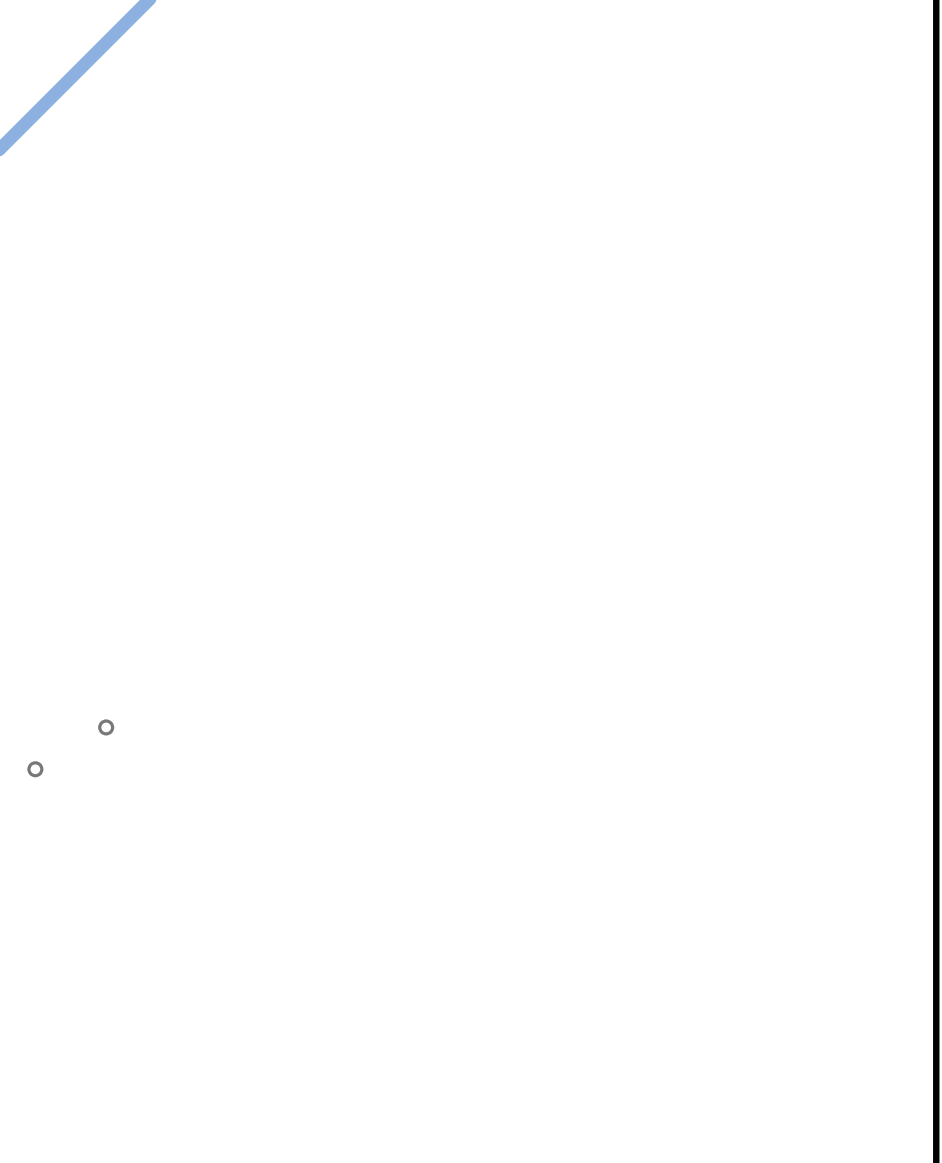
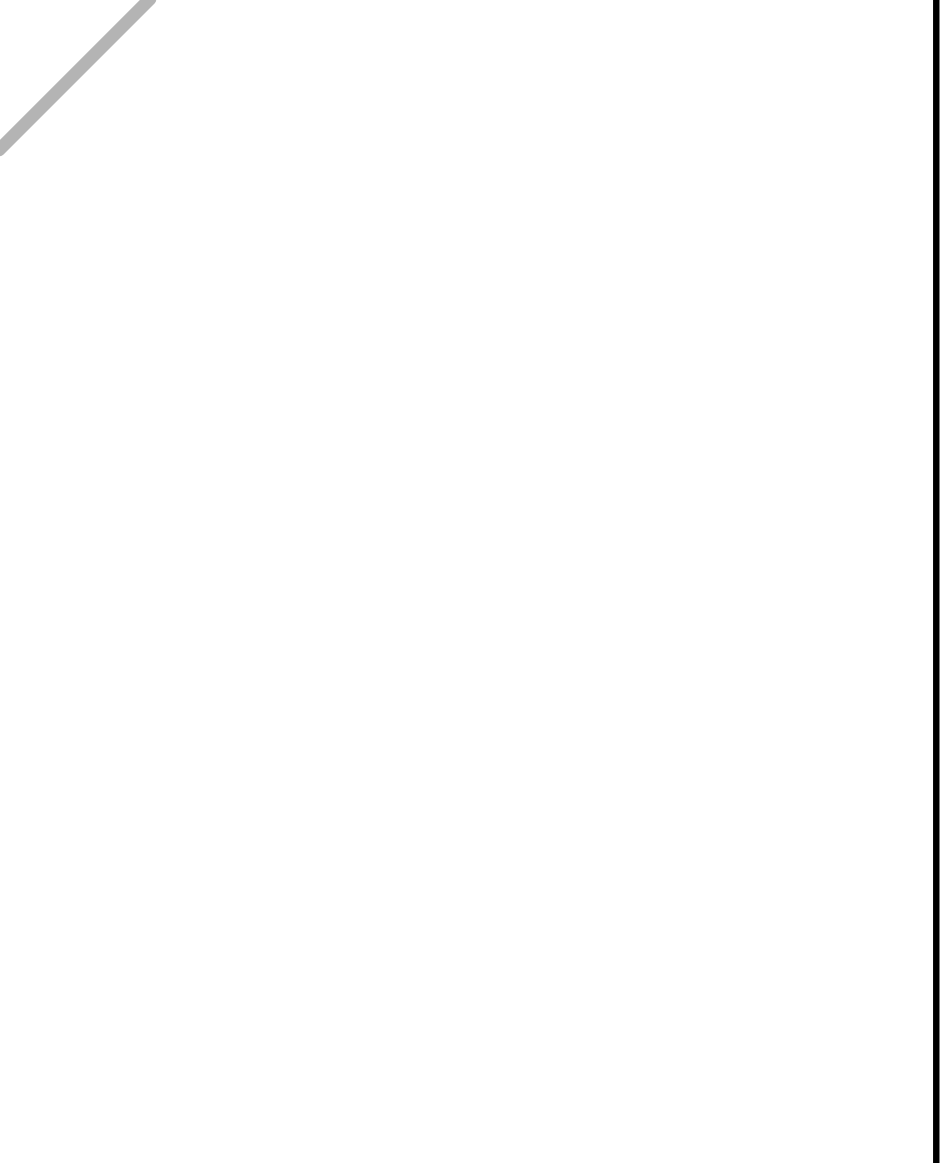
via: (106, 727) -> none
via: (35, 769) -> none

